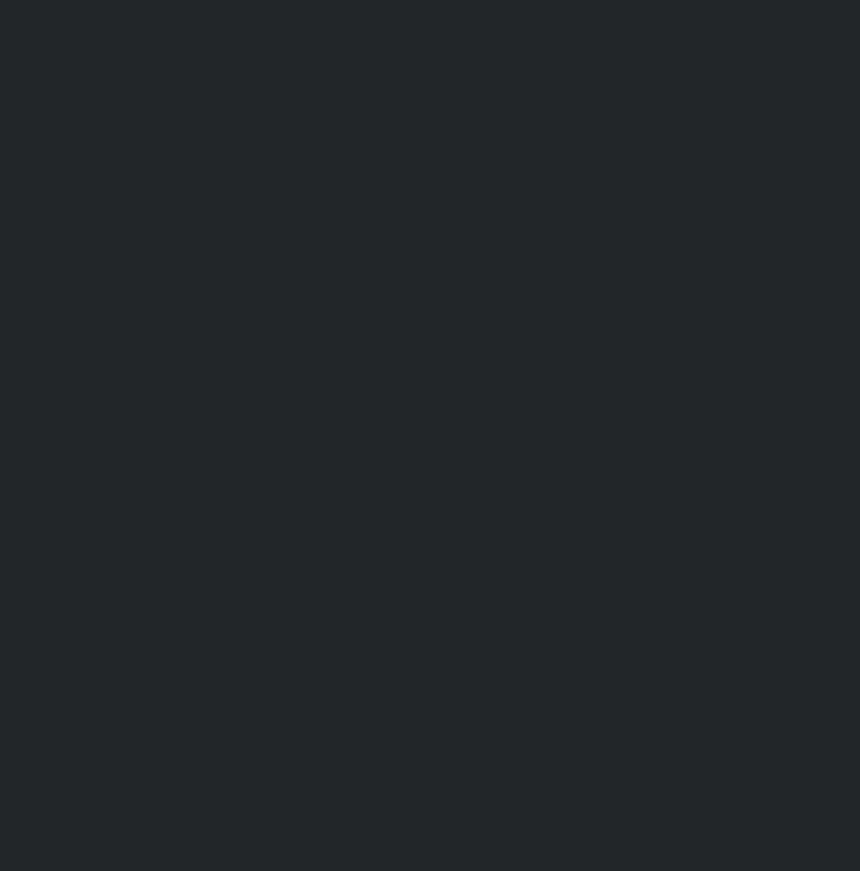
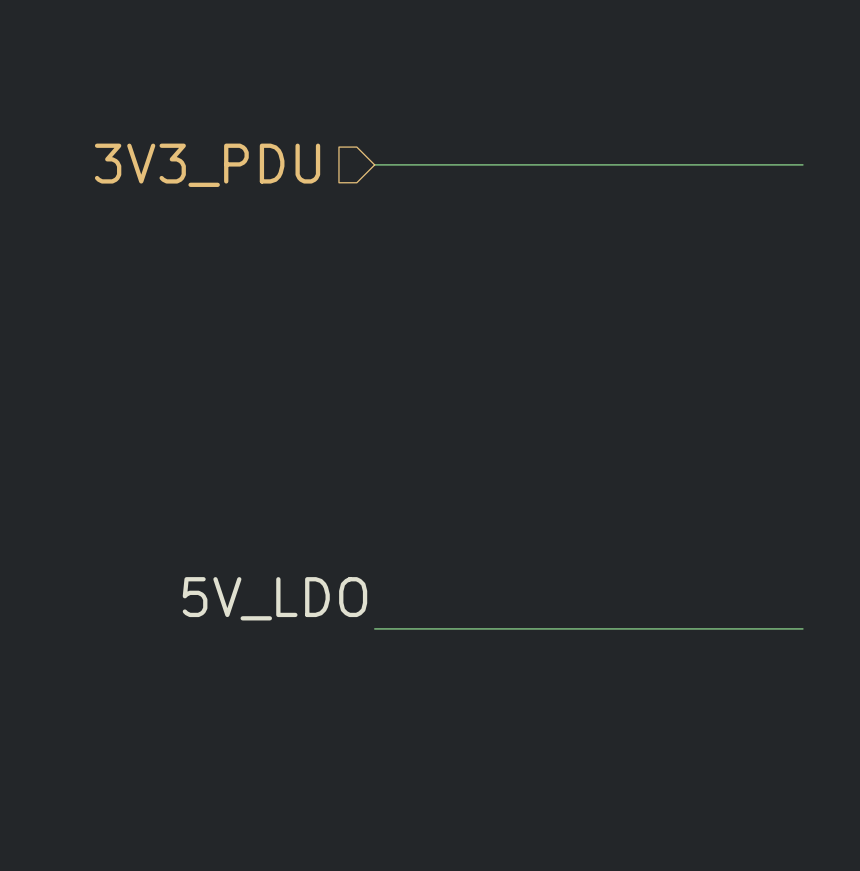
wire: none -> (374, 164) (803, 164)
hierarchical label: none -> 3V3_PDU (207, 165)
label: none -> 5V_LDO (274, 598)
wire: none -> (374, 628) (803, 628)

